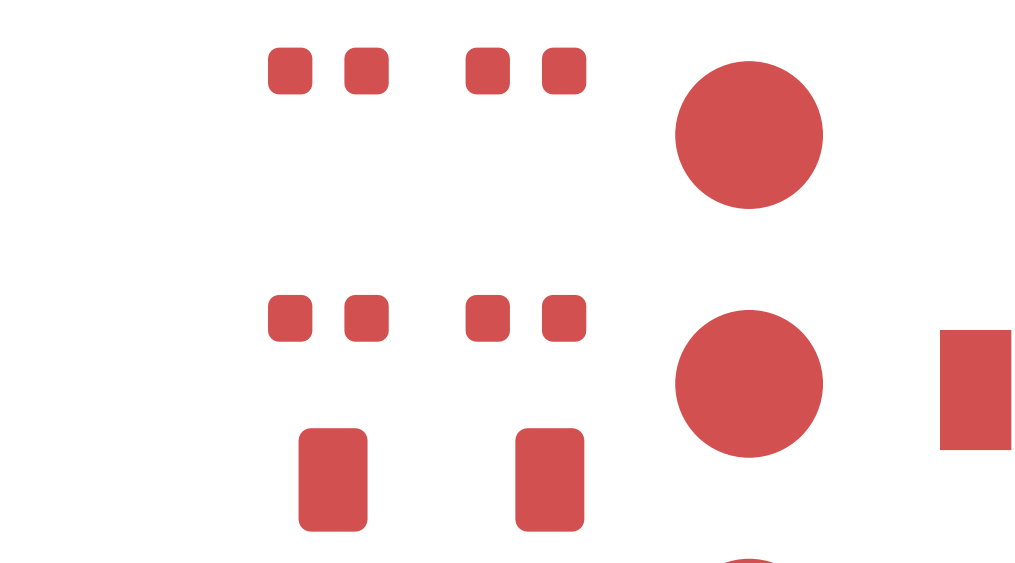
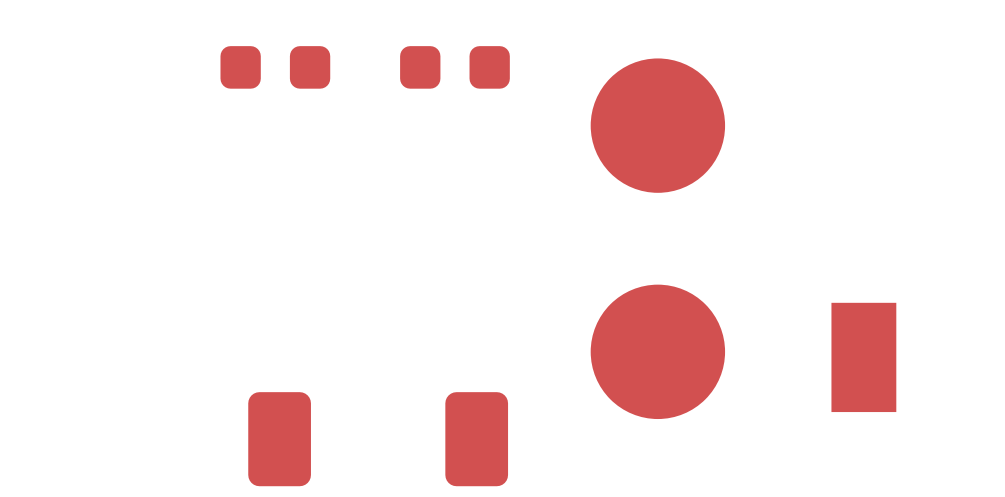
part: (328, 318) -> none
part: (525, 318) -> none

